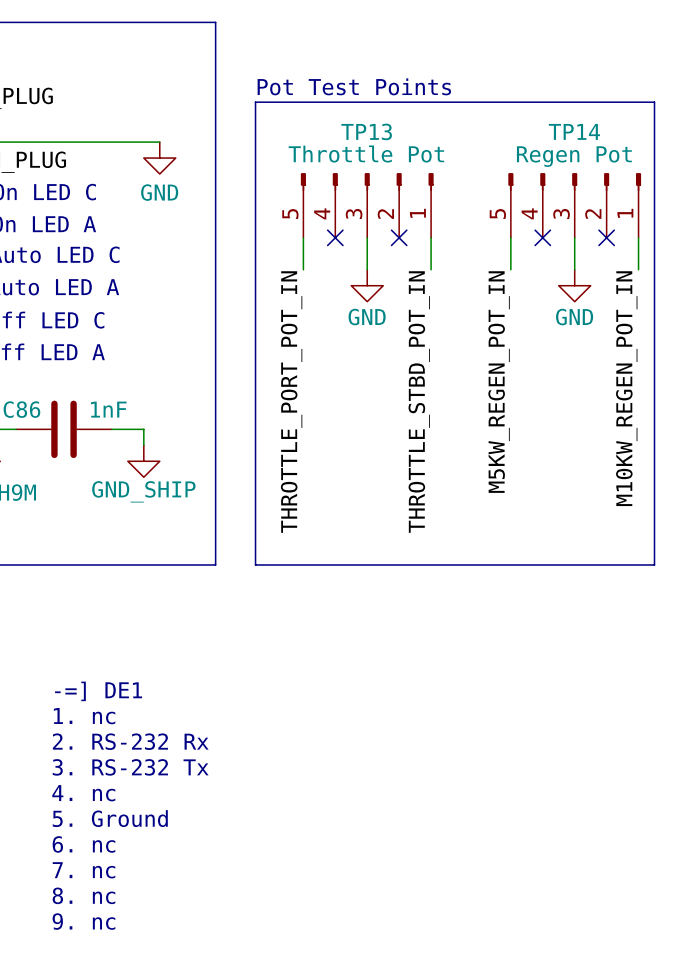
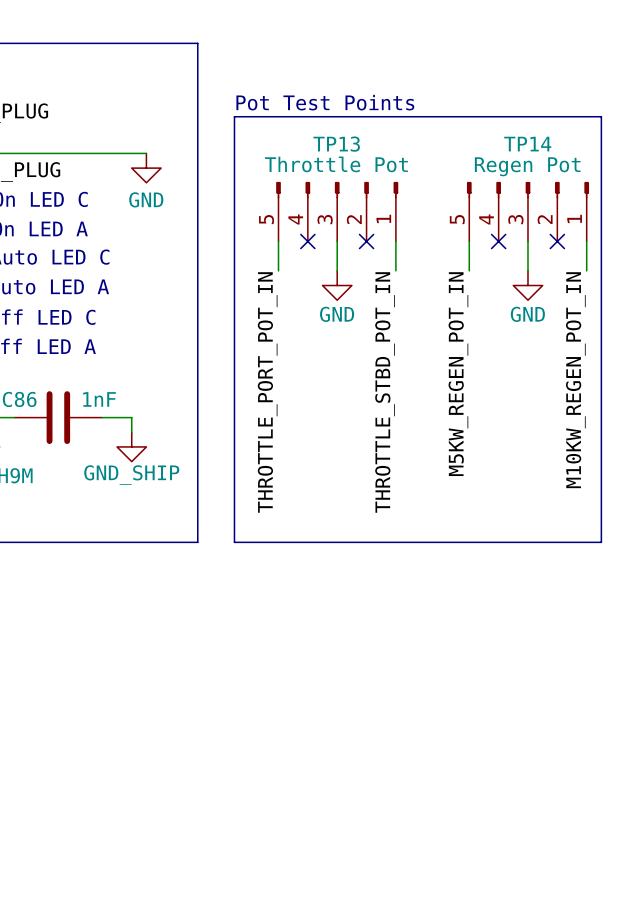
text: -=] DE1 (98, 691) -> none
text: 1. nc (84, 716) -> none
text: 2. RS-232 Rx (130, 741) -> none
text: 3. RS-232 Tx (130, 767) -> none
text: 4. nc (83, 793) -> none
text: 5. Ground (110, 818) -> none
text: 6. nc (83, 844) -> none
text: 7. nc (84, 870) -> none
text: 8. nc (83, 895) -> none
text: 9. nc (83, 921) -> none

